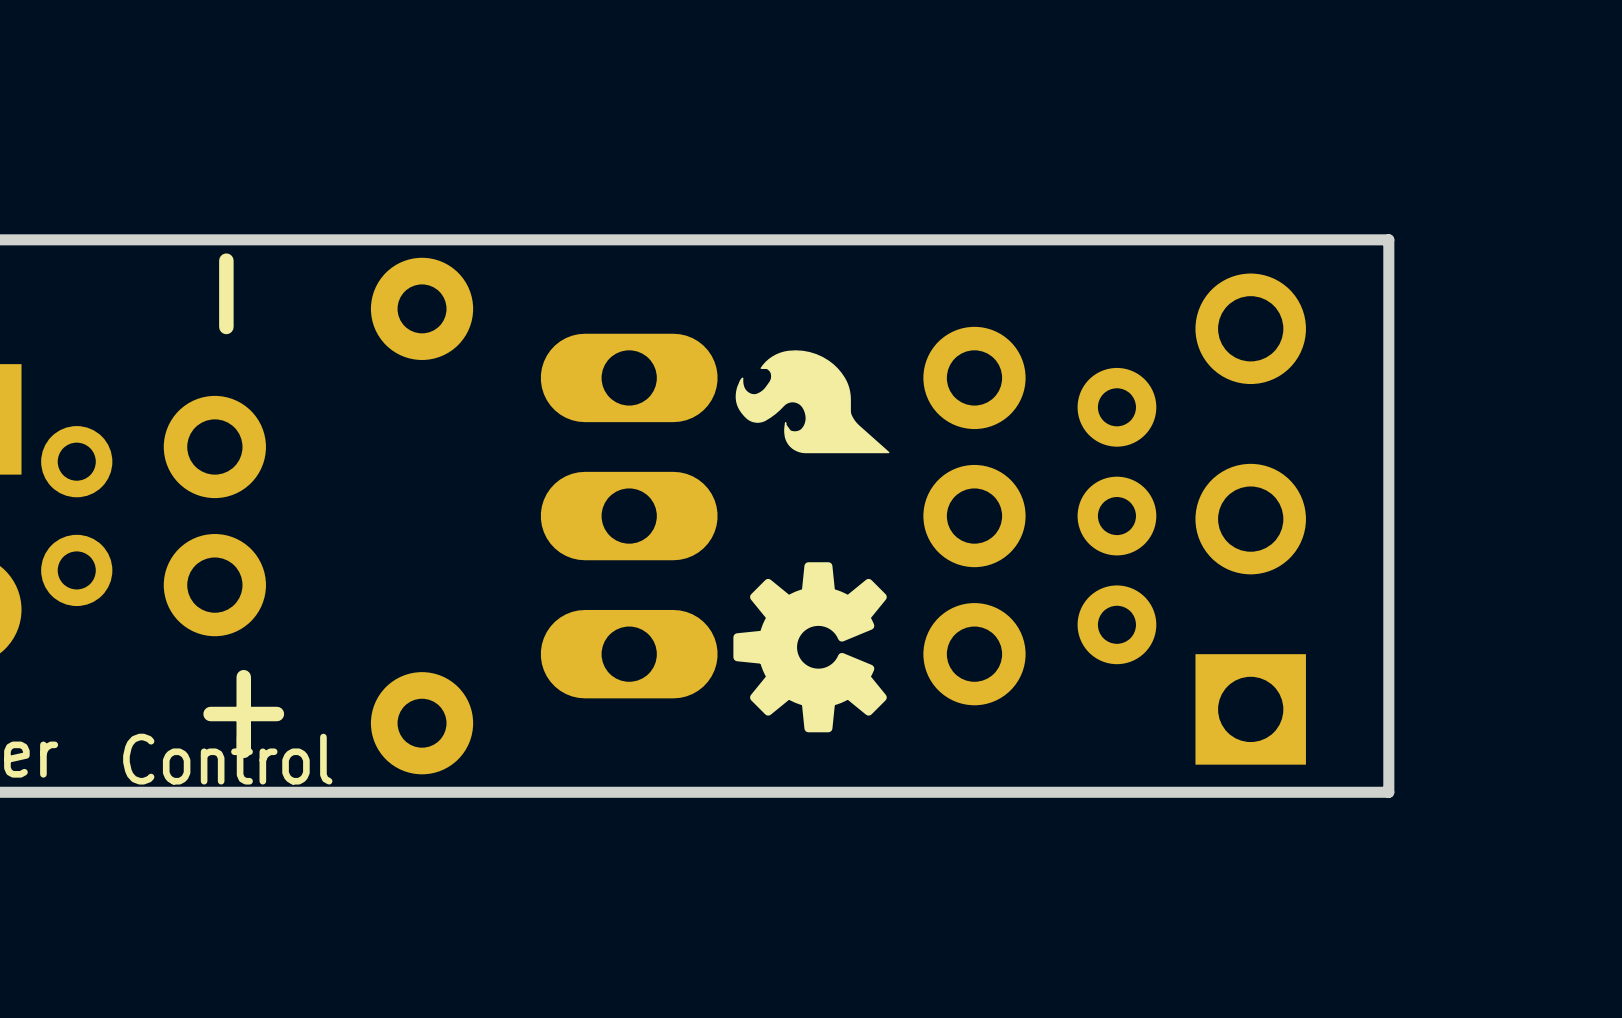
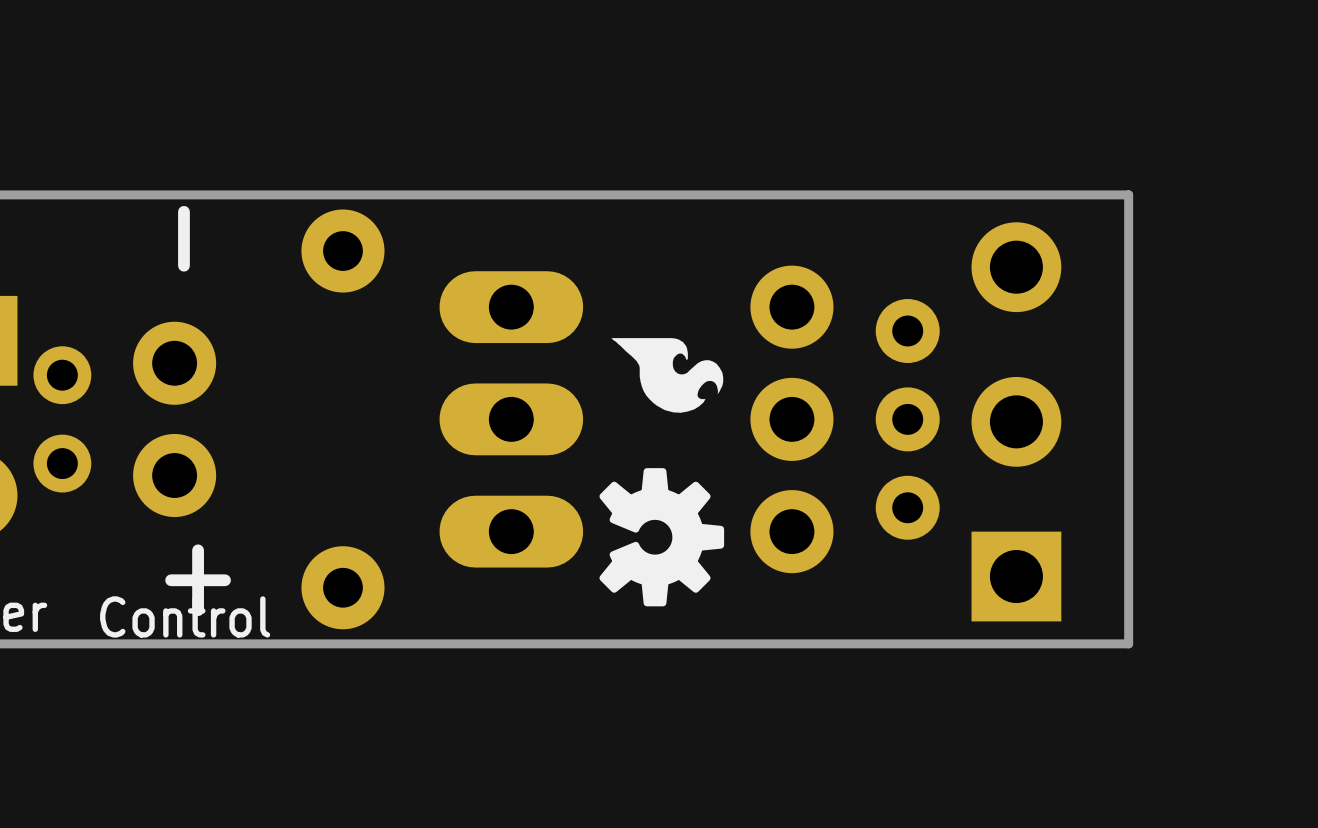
drawing: [735, 350, 890, 454] -> none
drawing: none -> [610, 338, 724, 413]
drawing shape: [733, 562, 887, 733] -> [599, 468, 725, 607]

